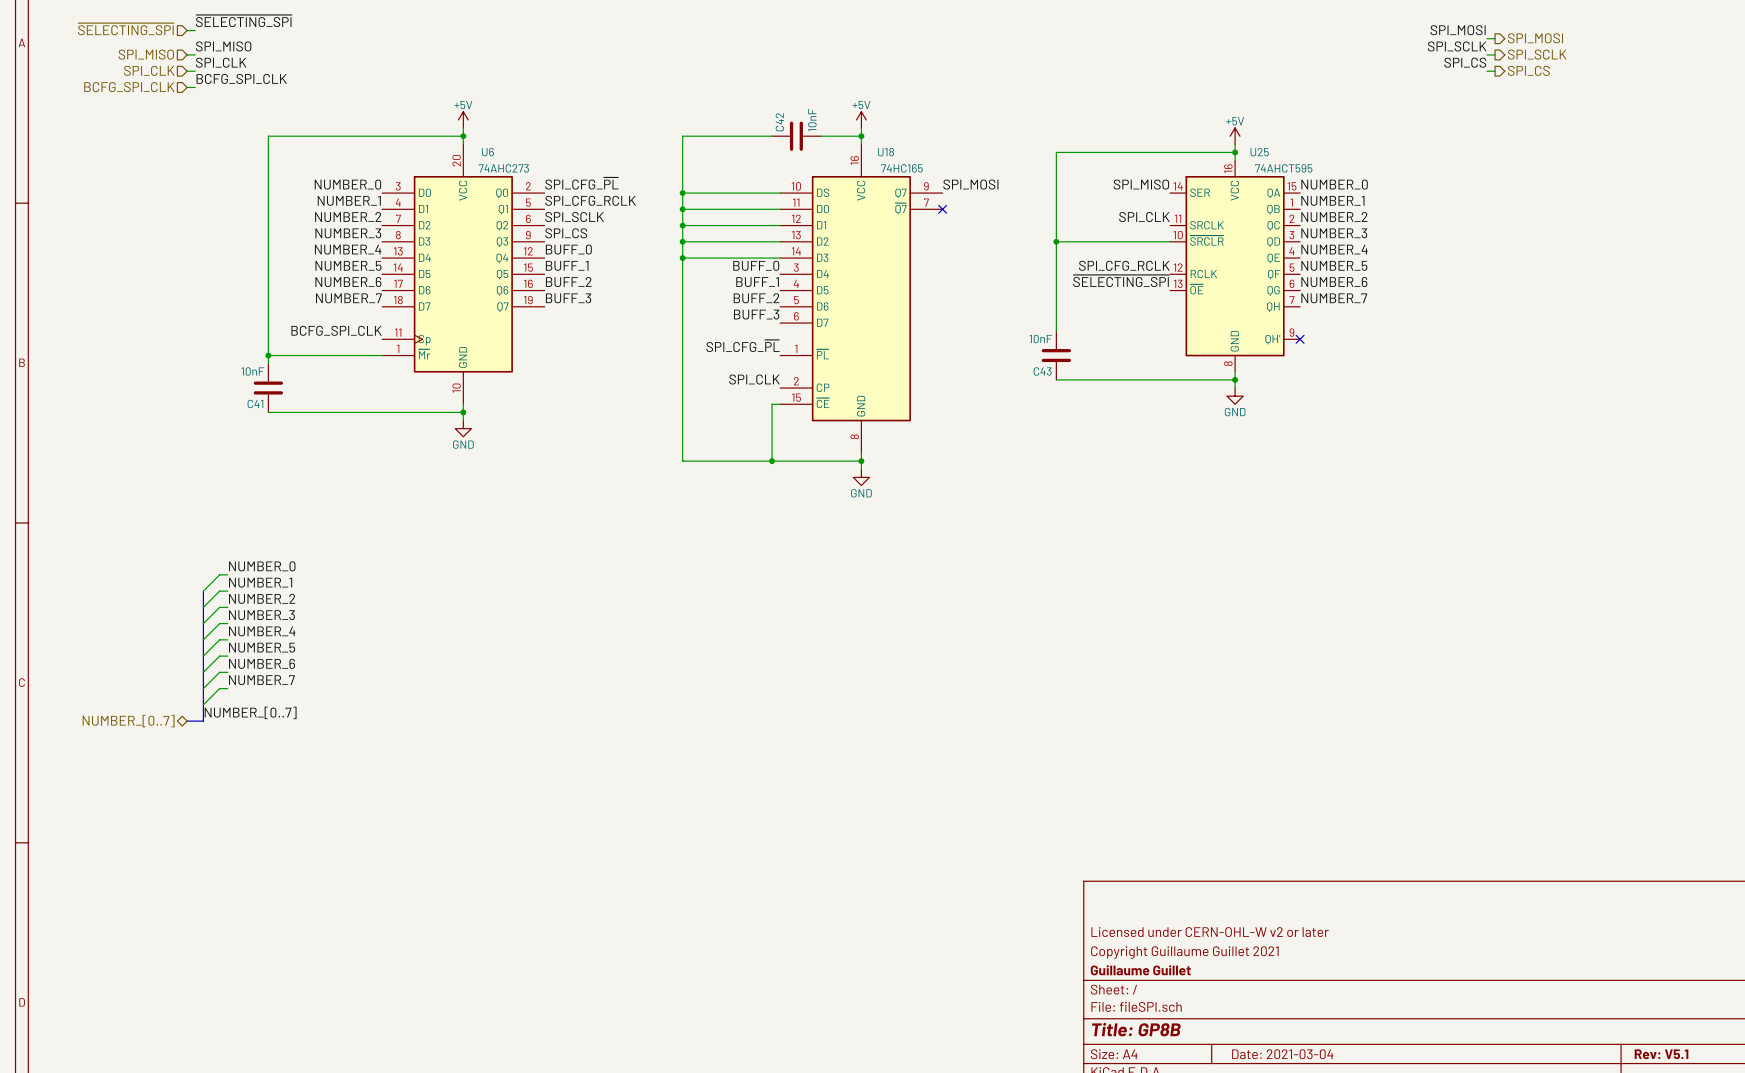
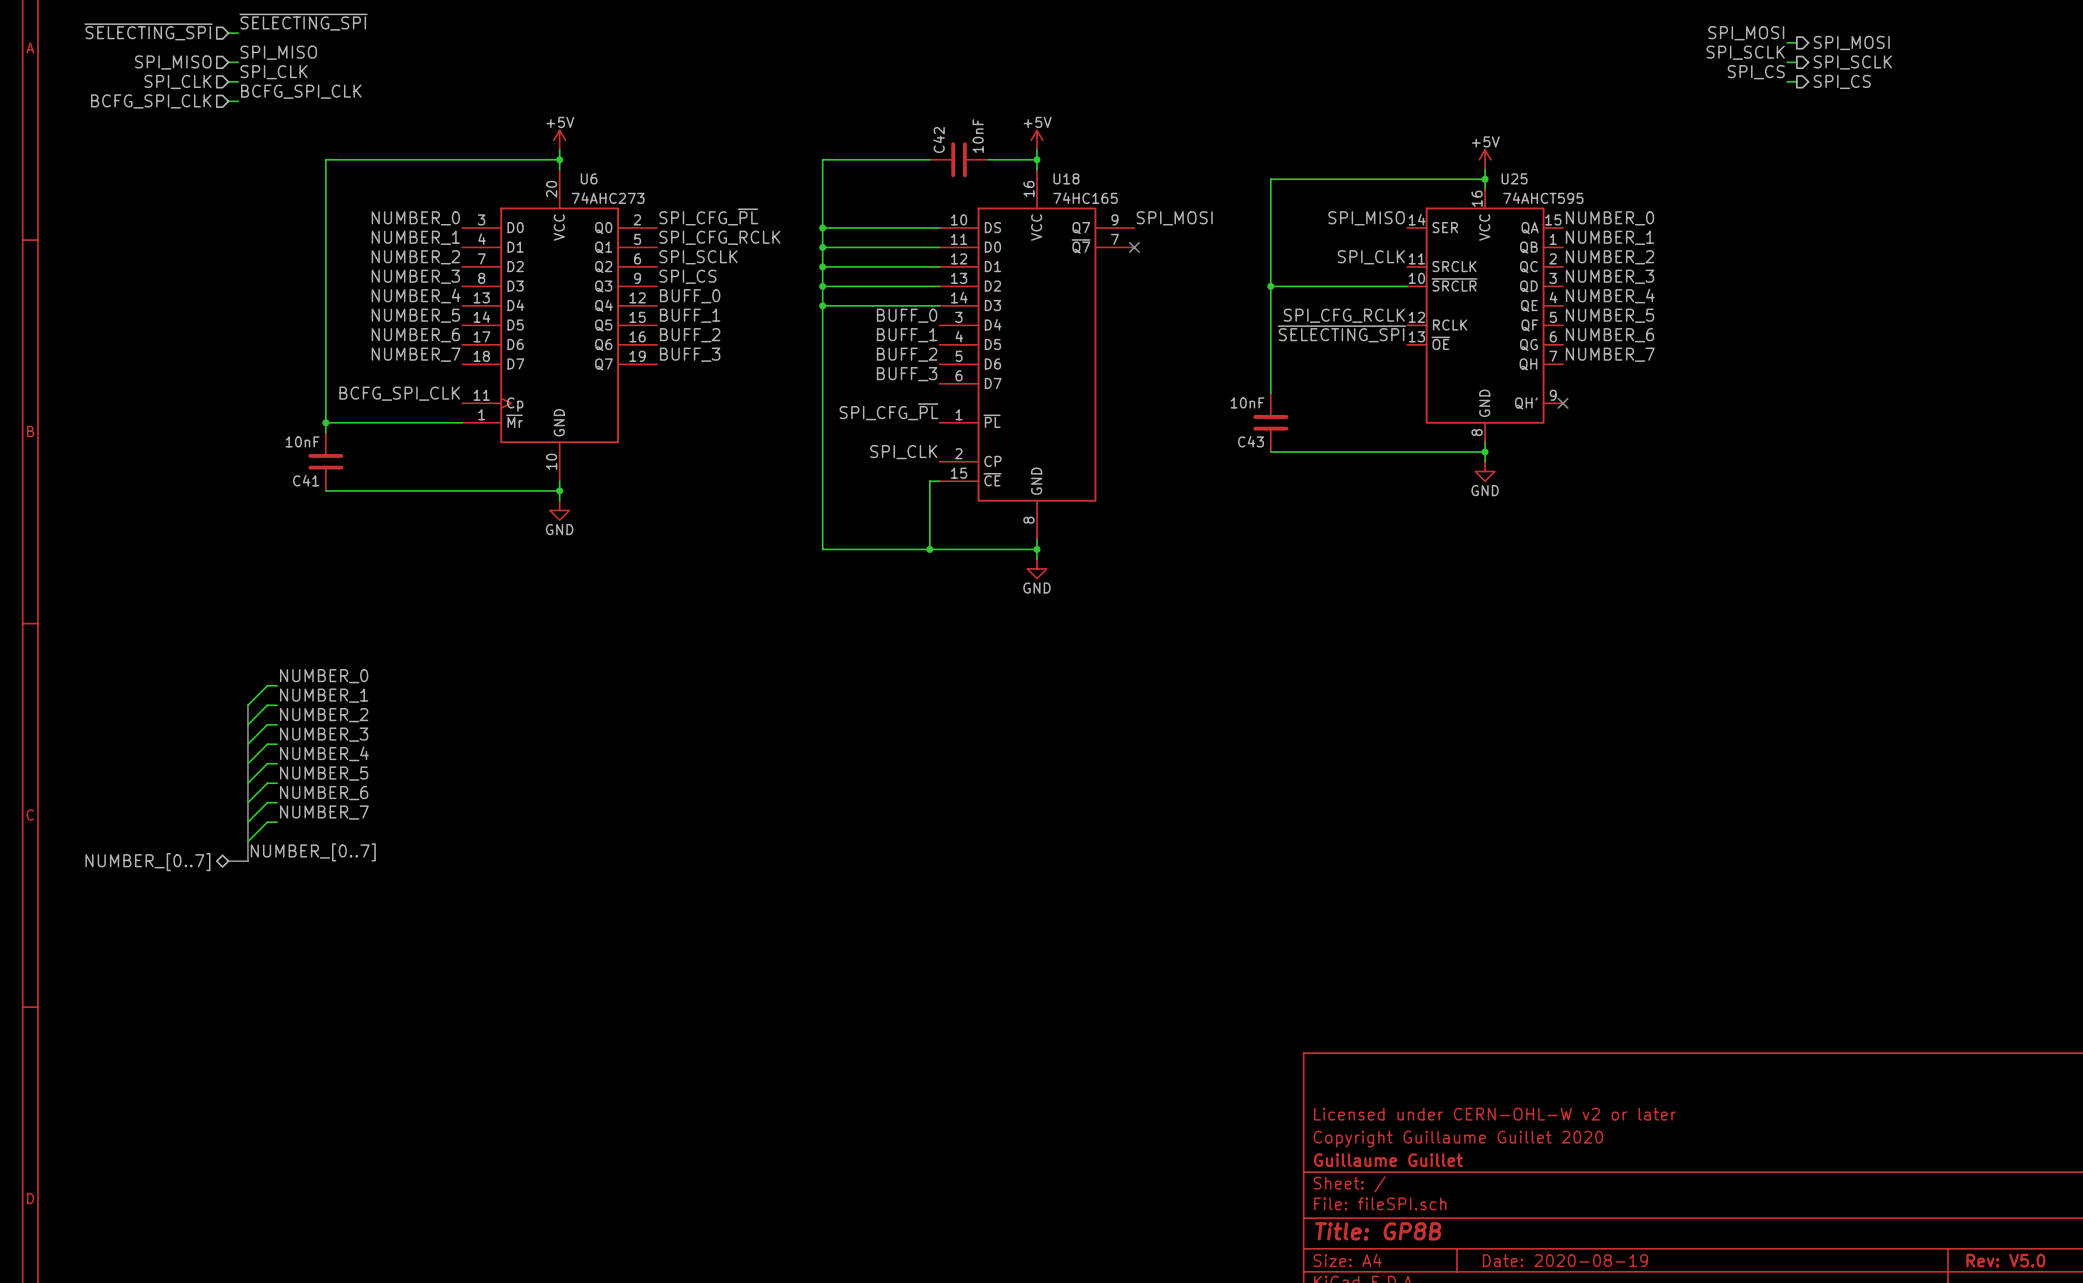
title block: Copyright Guillaume Guillet 2021 (1184, 952) -> Copyright Guillaume Guillet 2020 (1458, 1139)
title block: Date: 2021-03-04 (1282, 1054) -> Date: 2020-08-19 (1565, 1260)
title block: Rev: V5.1 (1661, 1054) -> Rev: V5.0 (2005, 1260)

